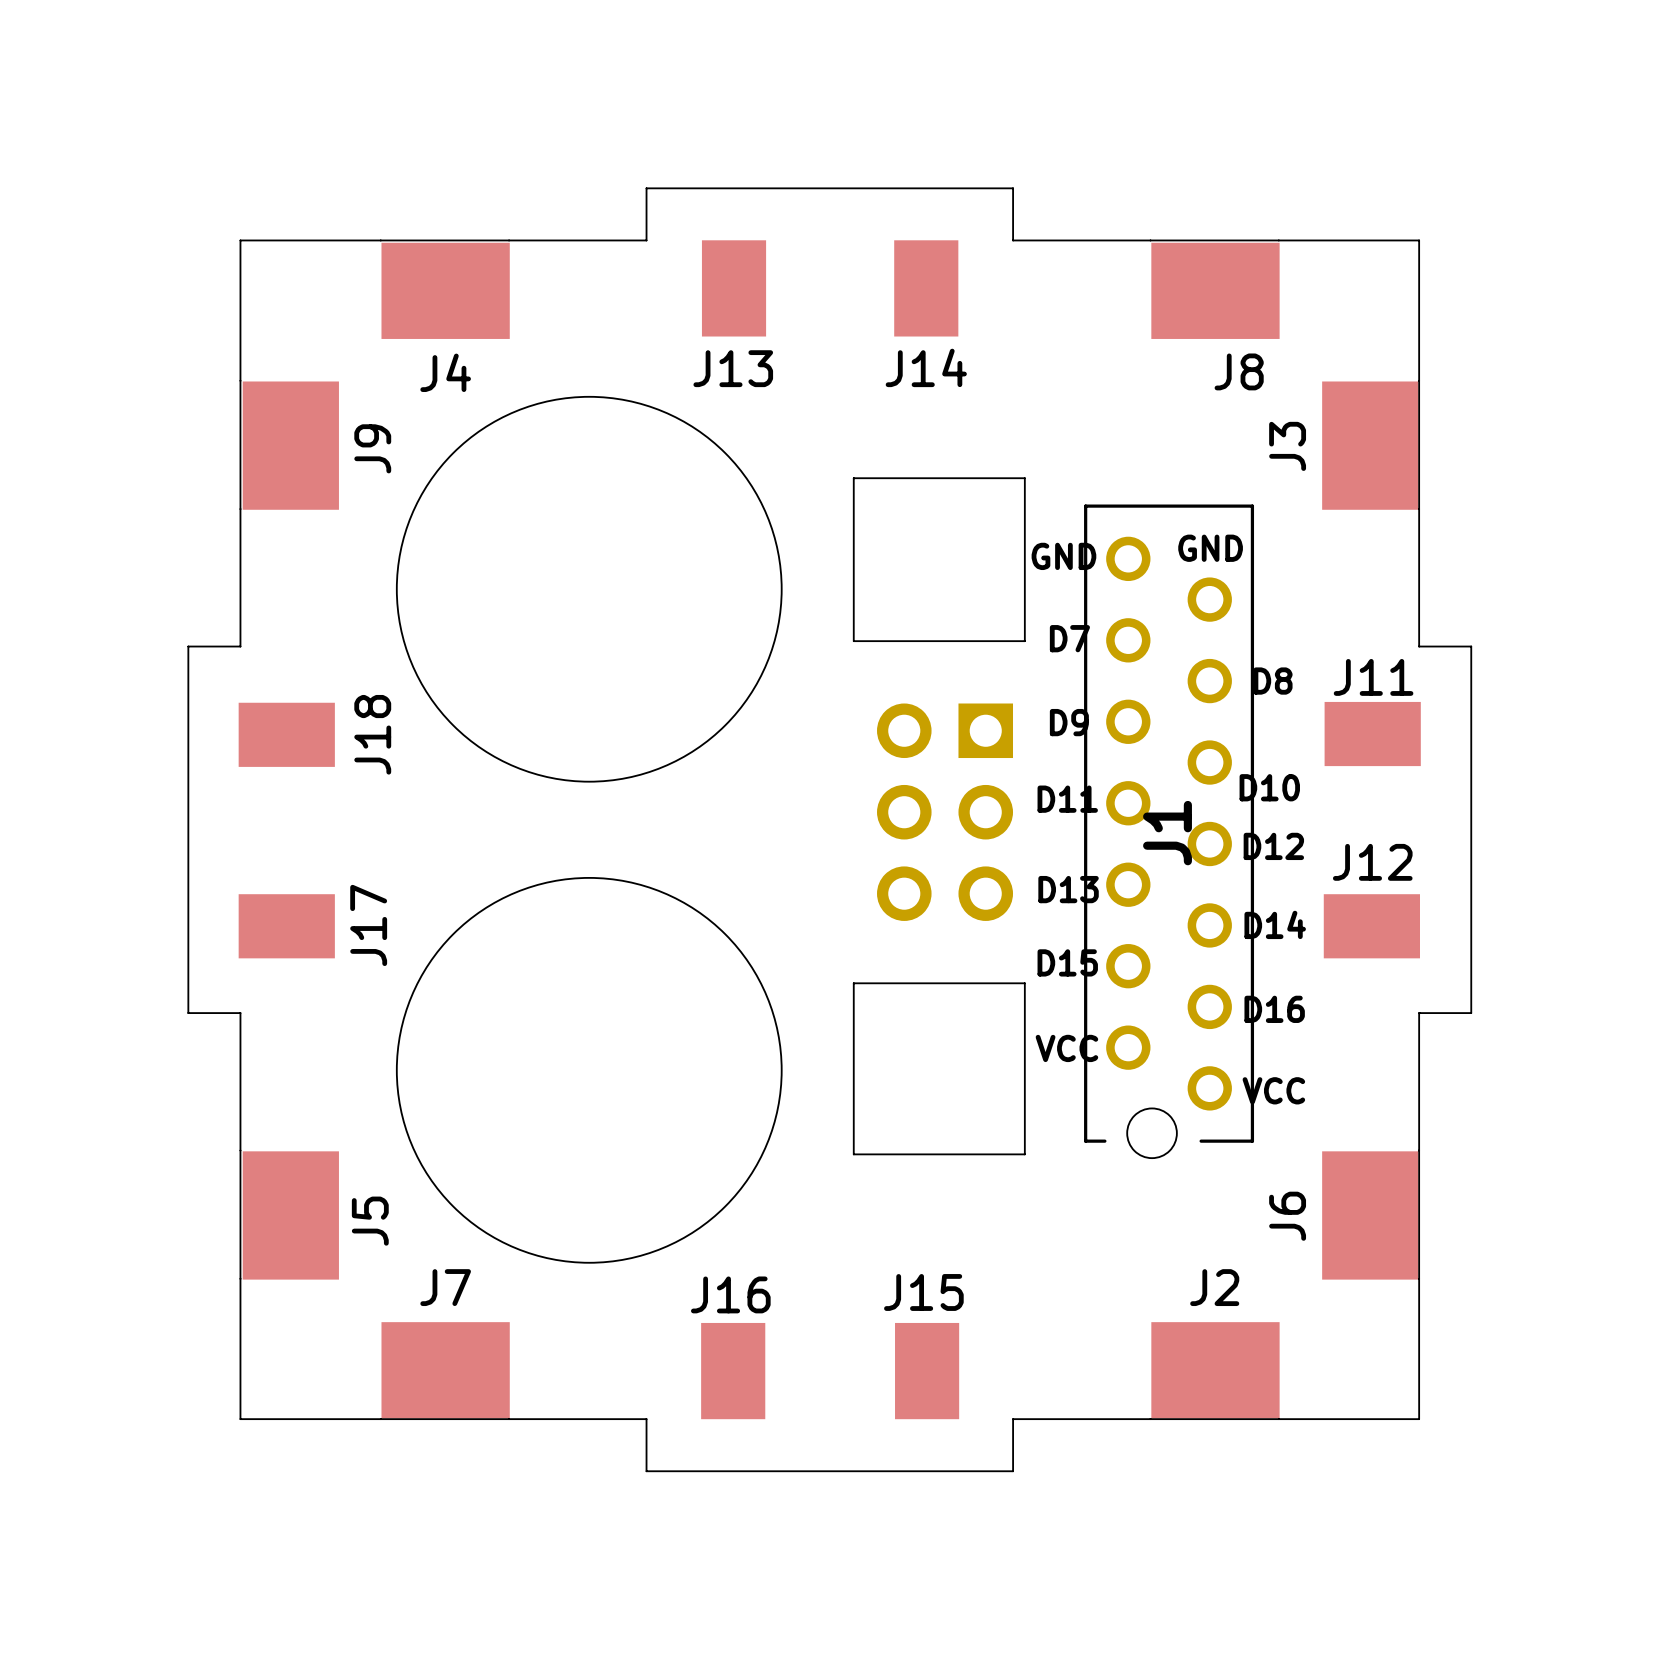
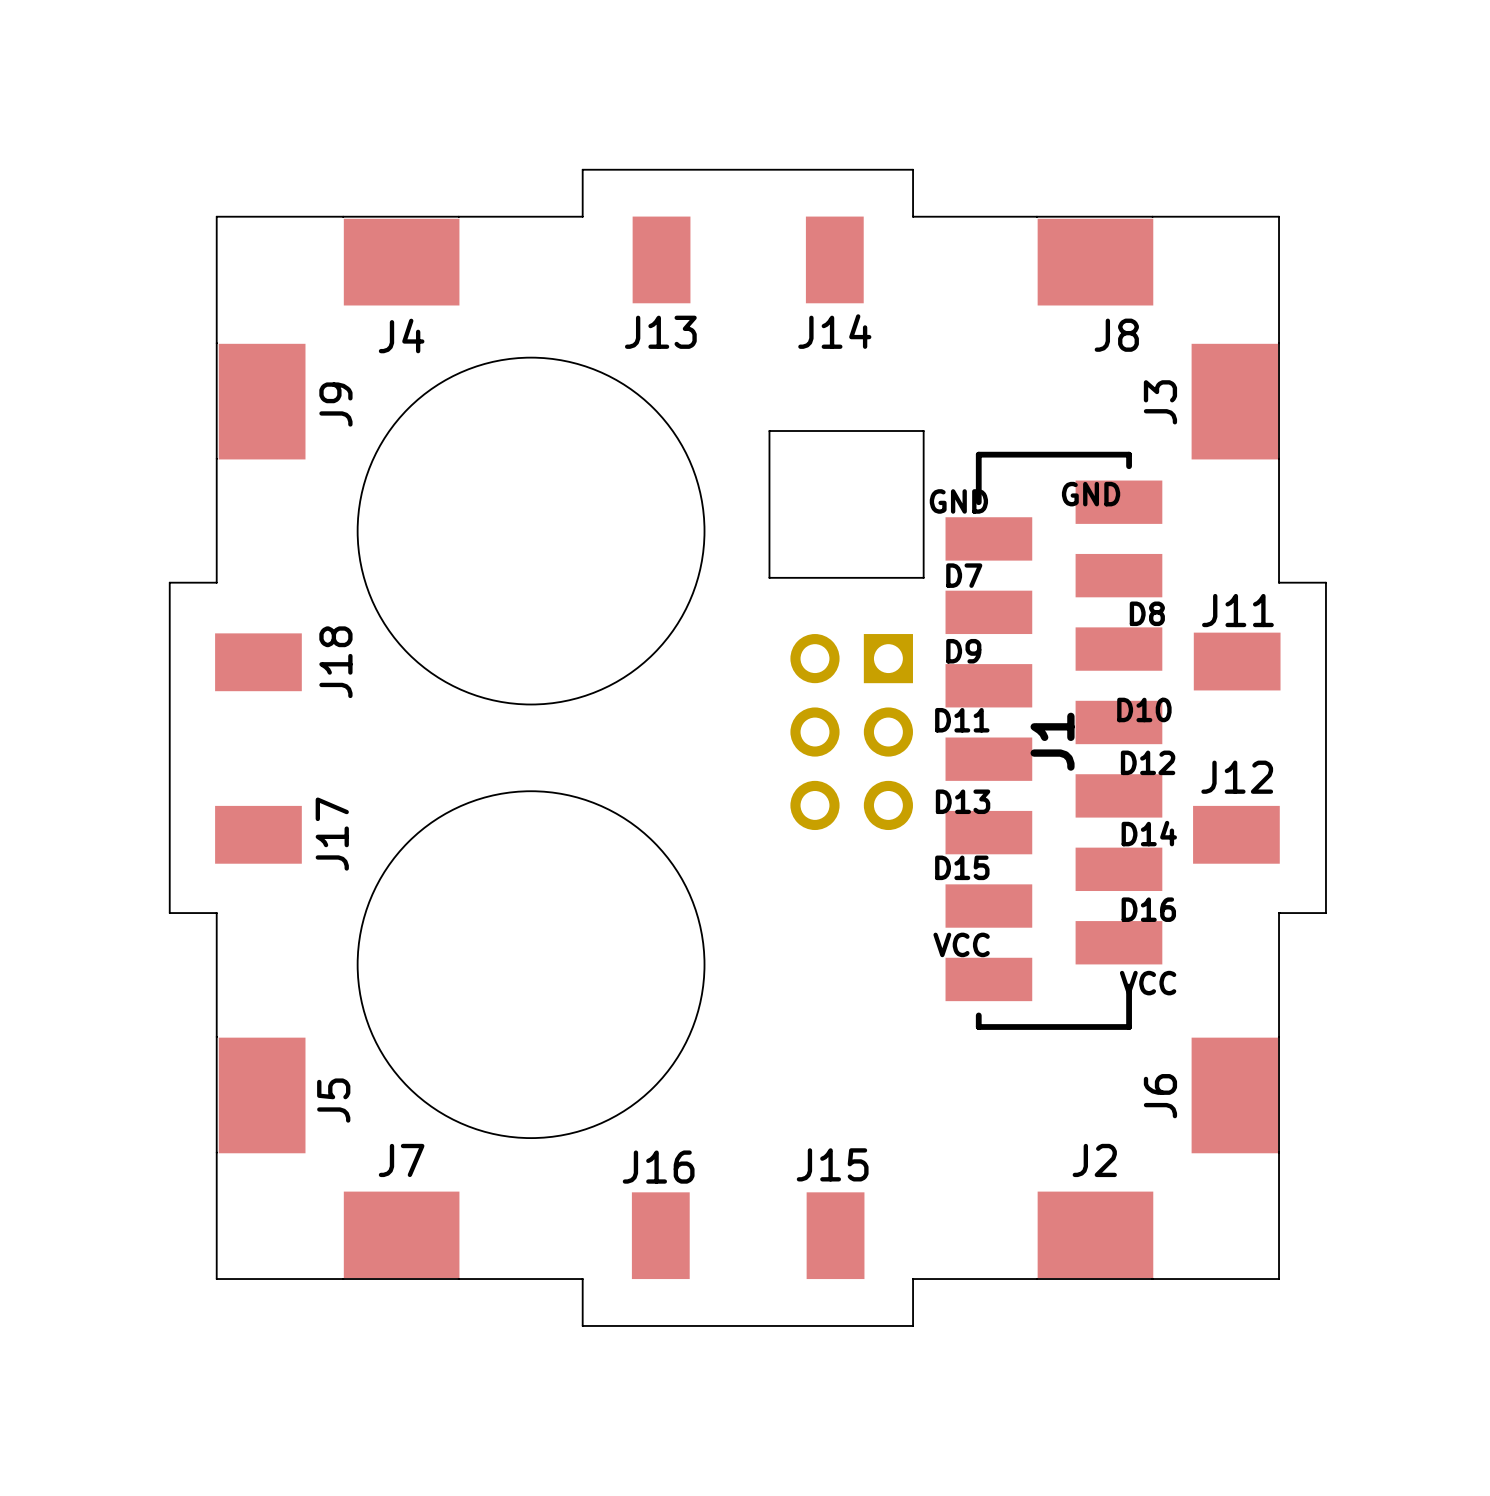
J1 footprint: [1084, 504, 1255, 1159] -> [945, 451, 1163, 1030]
board edge: (853, 983) (1024, 983) (1024, 1154) (853, 1154) (853, 983) -> none

